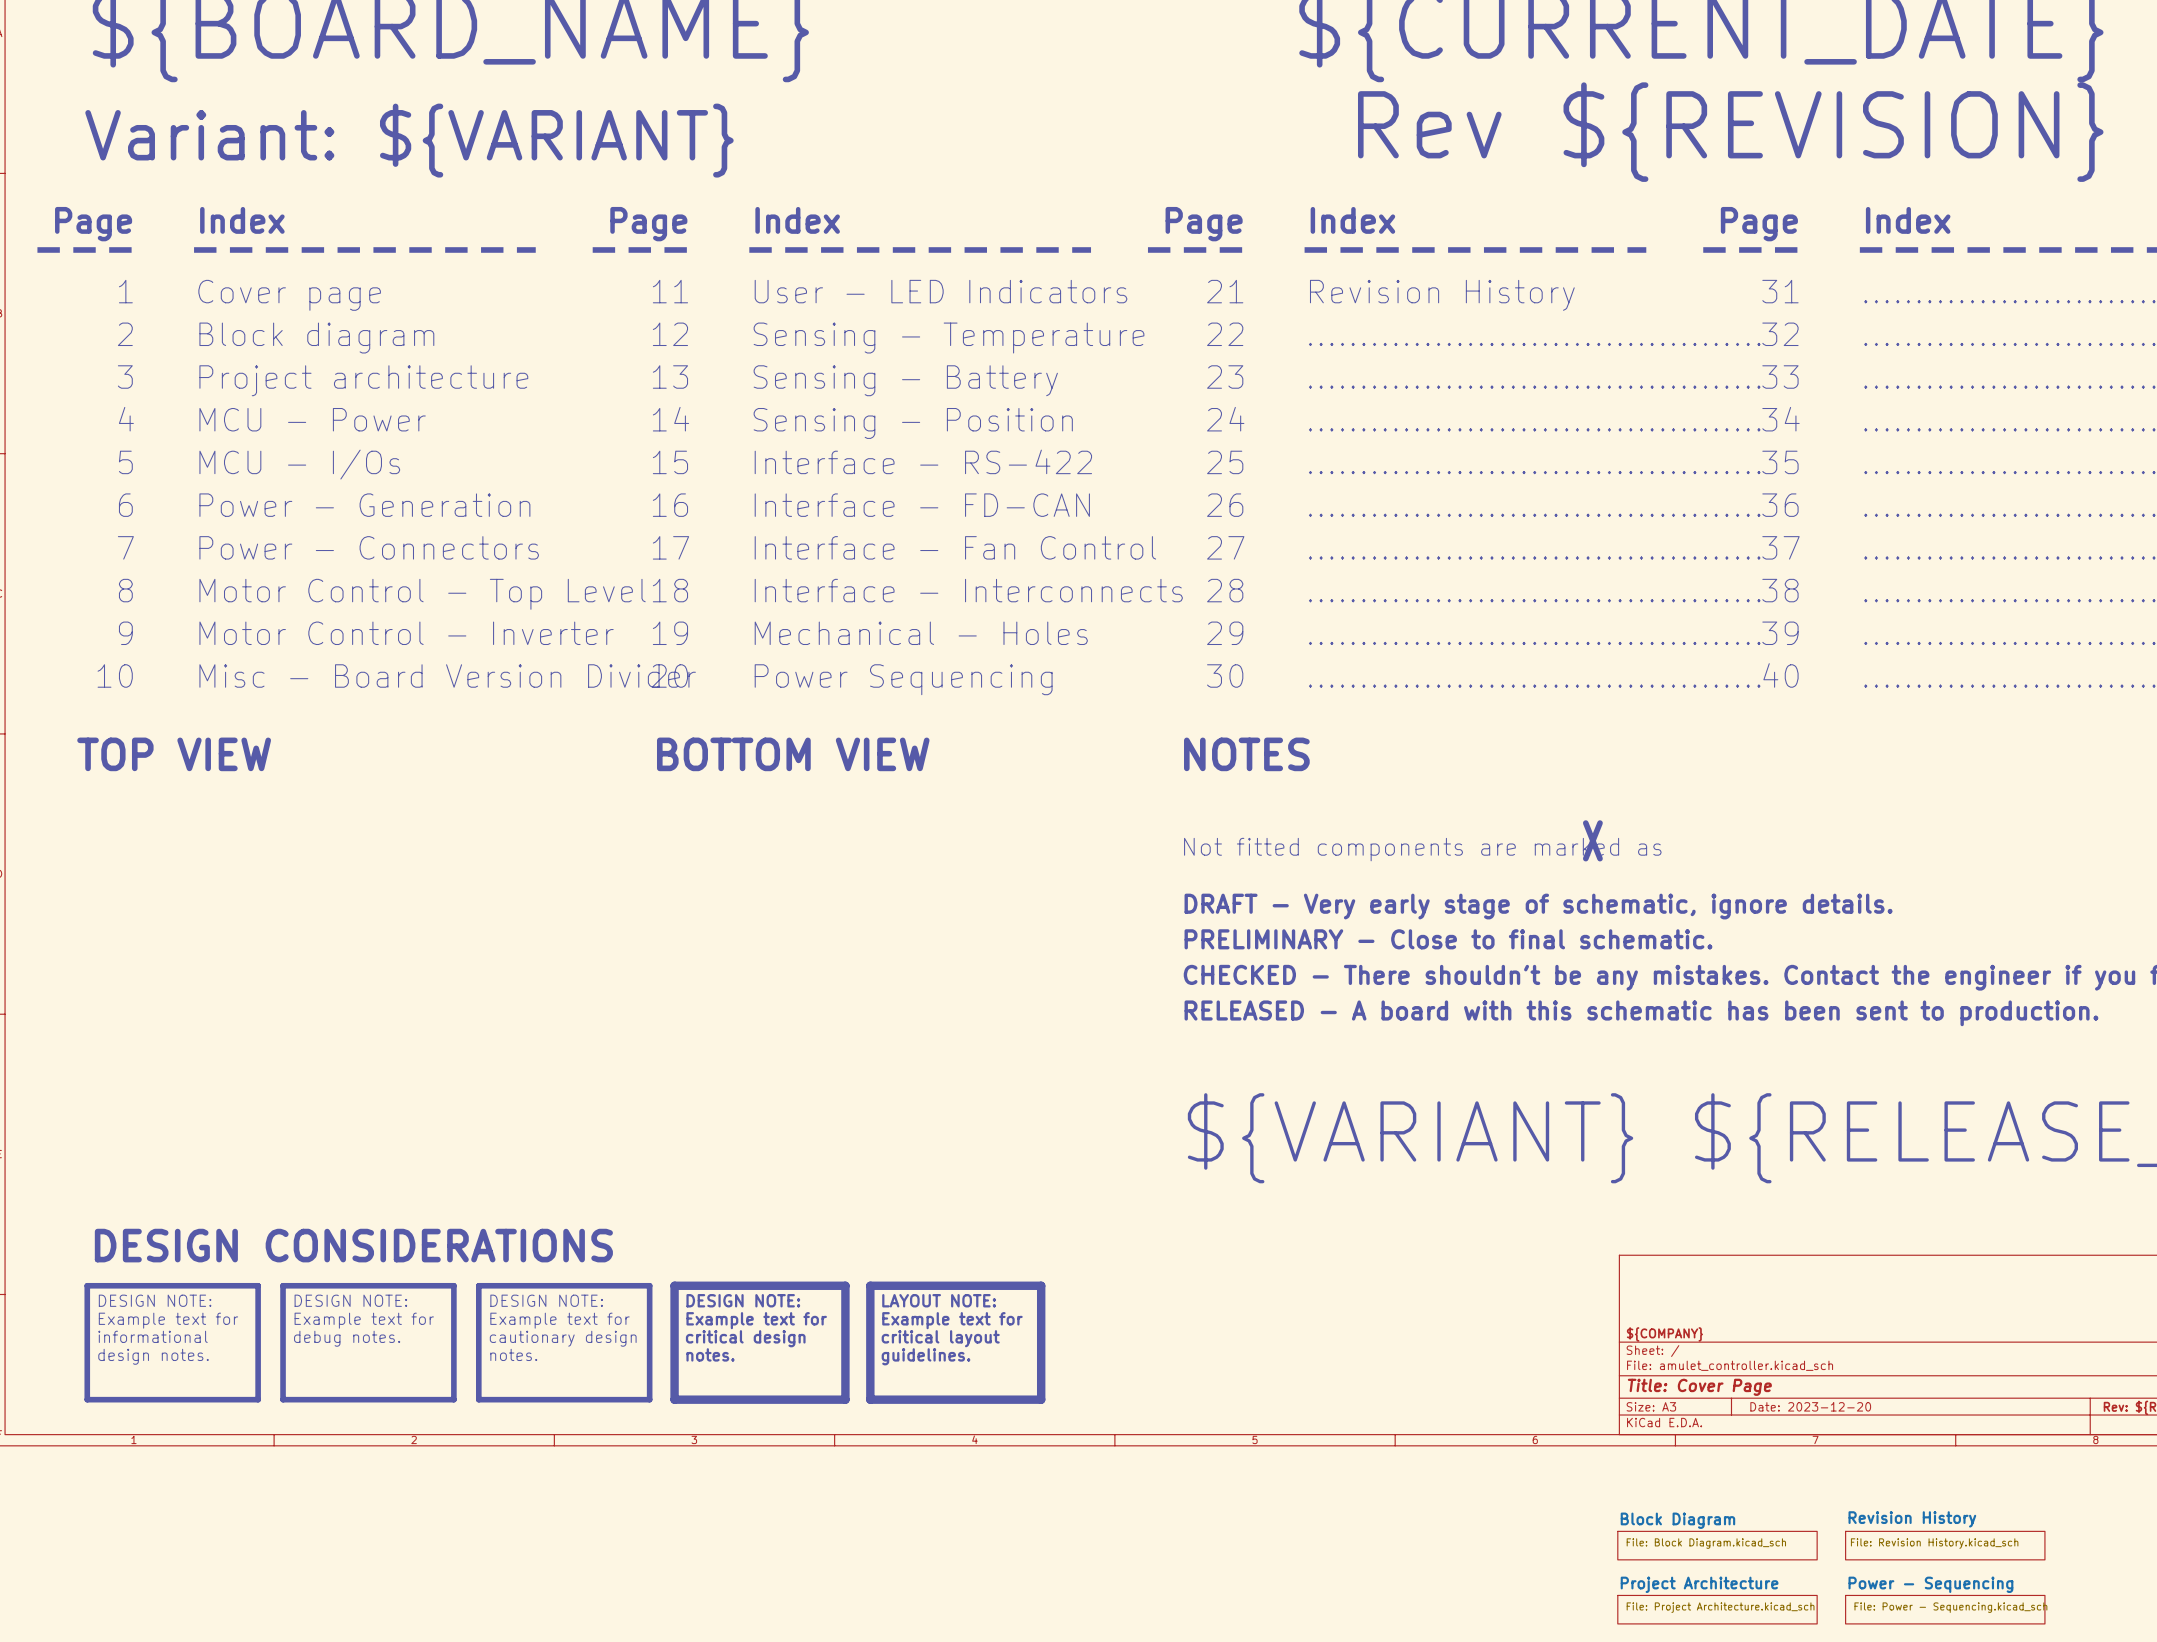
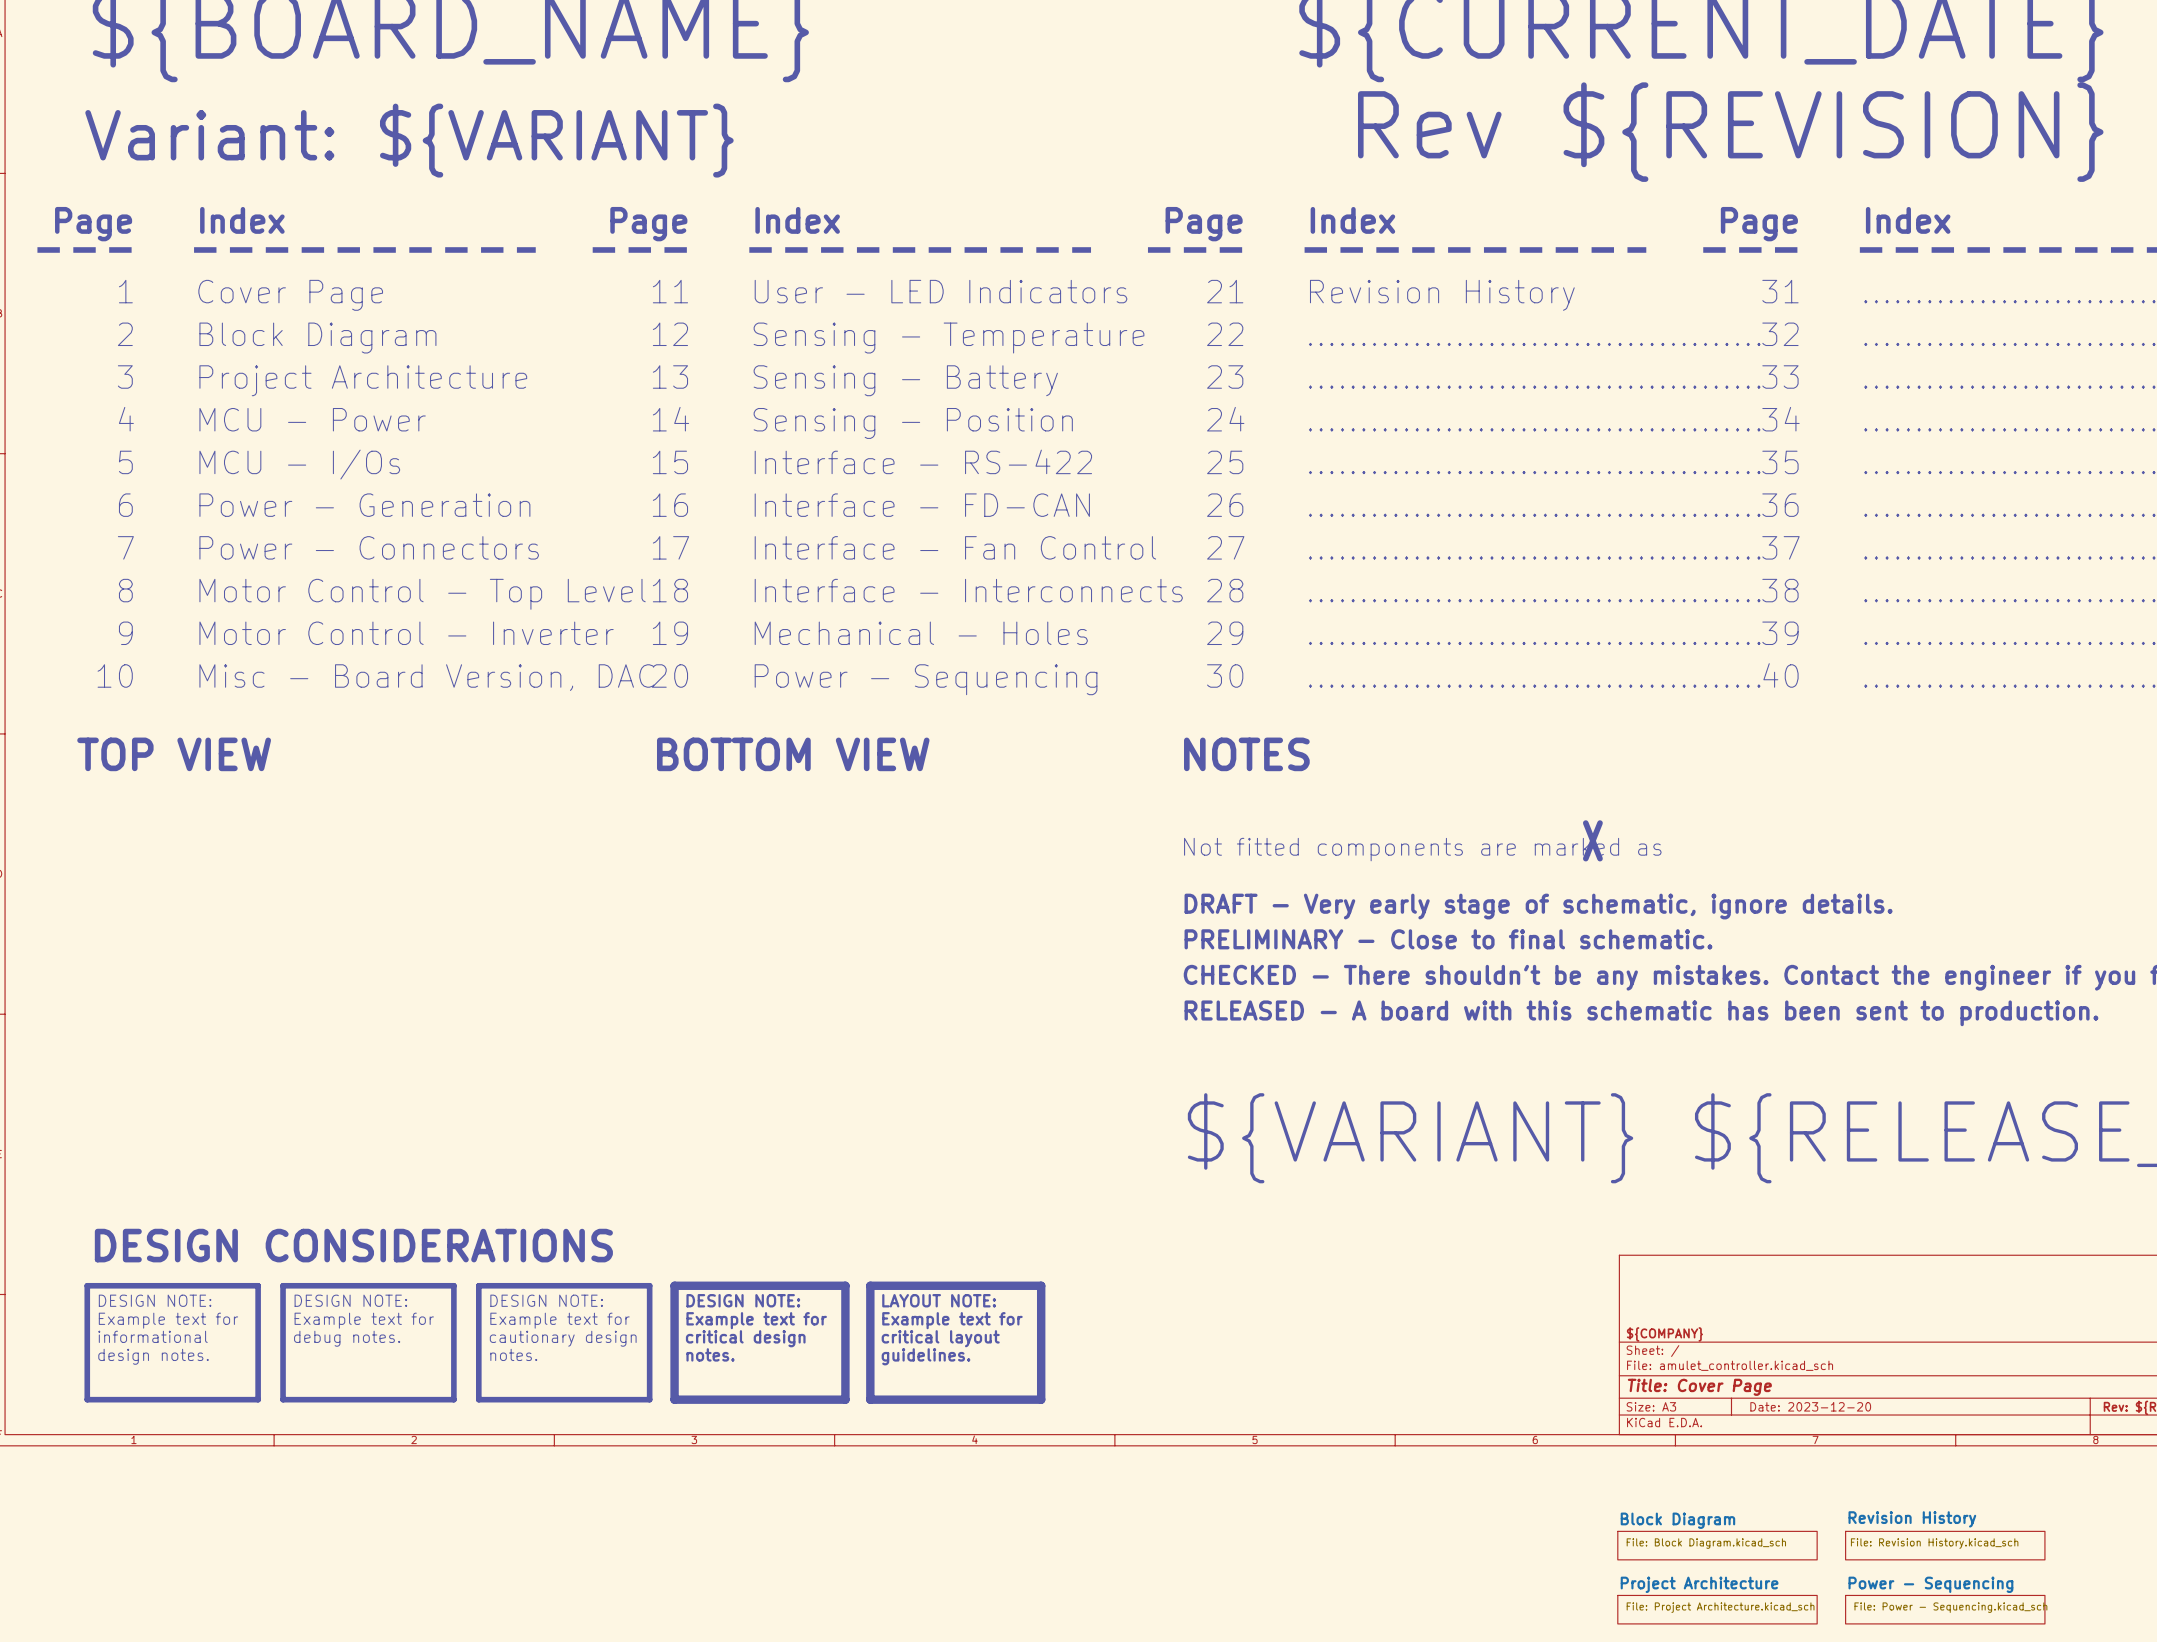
text: Cover page (289, 295) -> Cover Page (290, 295)
text: Block diagram (316, 338) -> Block Diagram (317, 338)
text: Project architecture (363, 380) -> Project Architecture (363, 380)
text: Misc - Board Version Divider (447, 675) -> Misc - Board Version, DAC (426, 677)
text: Power Sequencing (903, 679) -> Power - Sequencing (926, 679)

